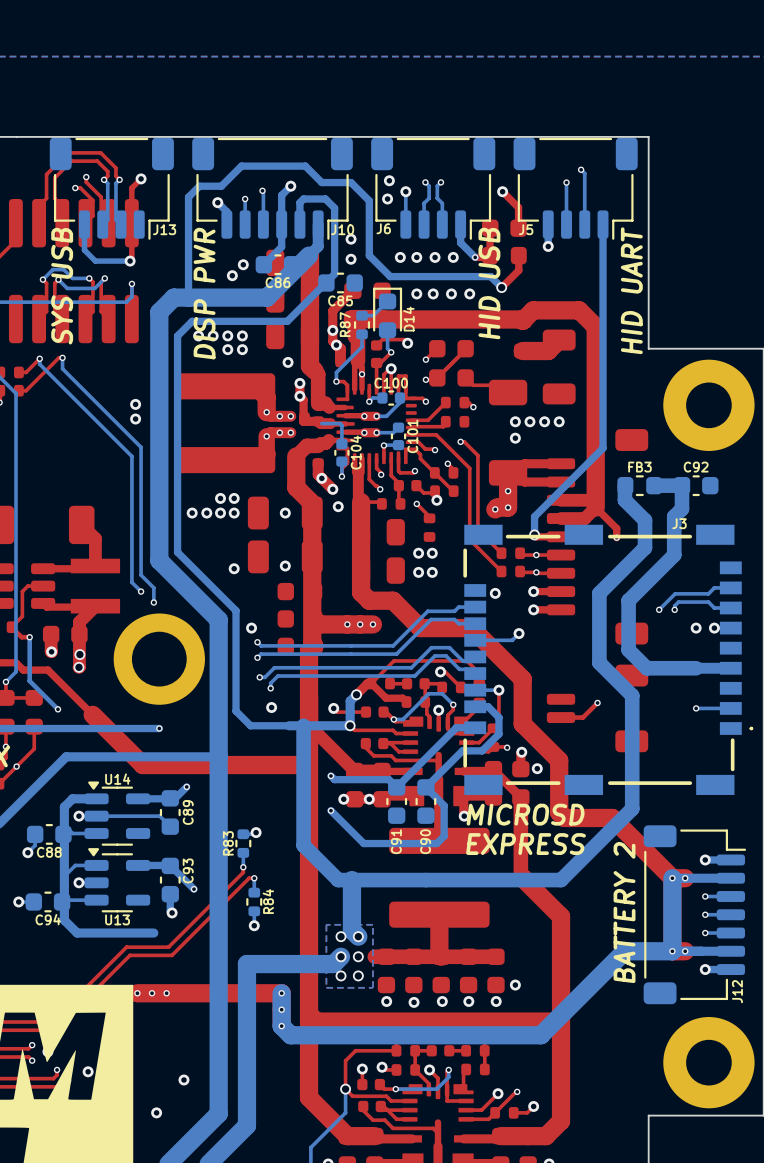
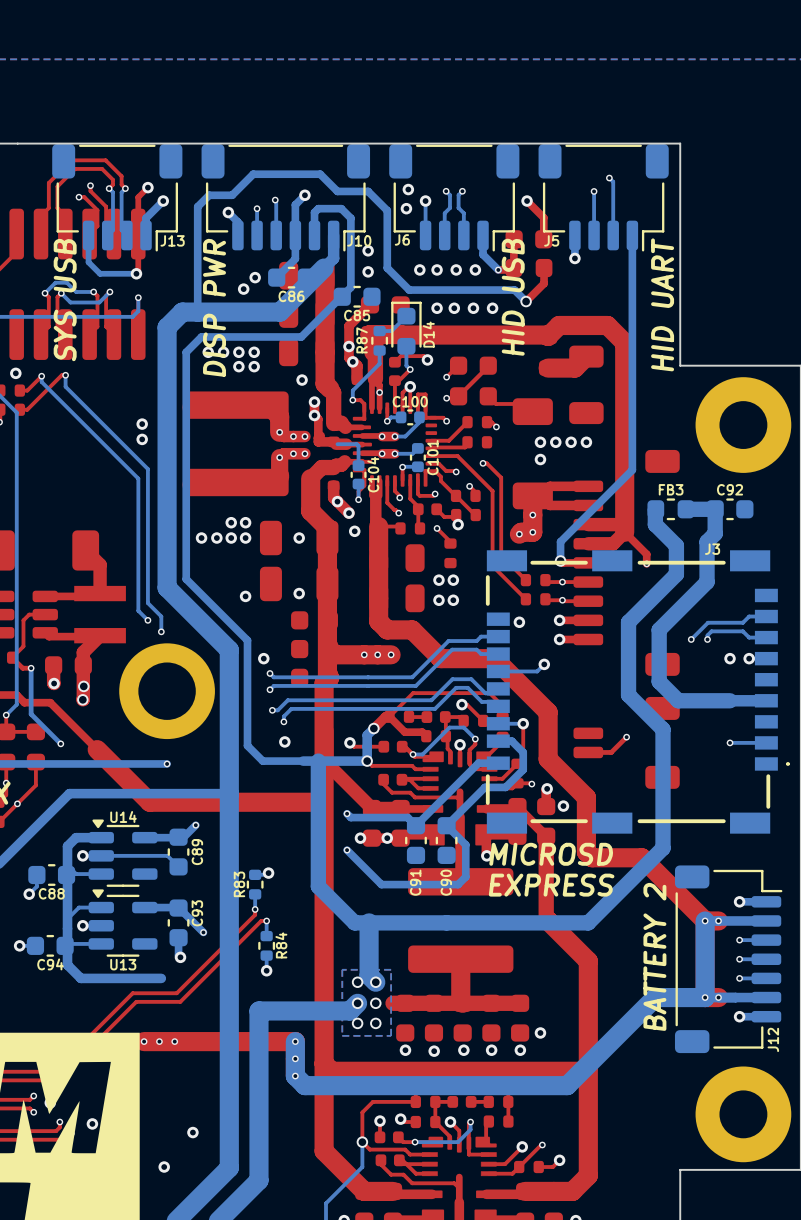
bottom track: none -> (163, 201) (146, 218) (146, 235)
via: none -> (163, 201)
via: none -> (15, 373)

